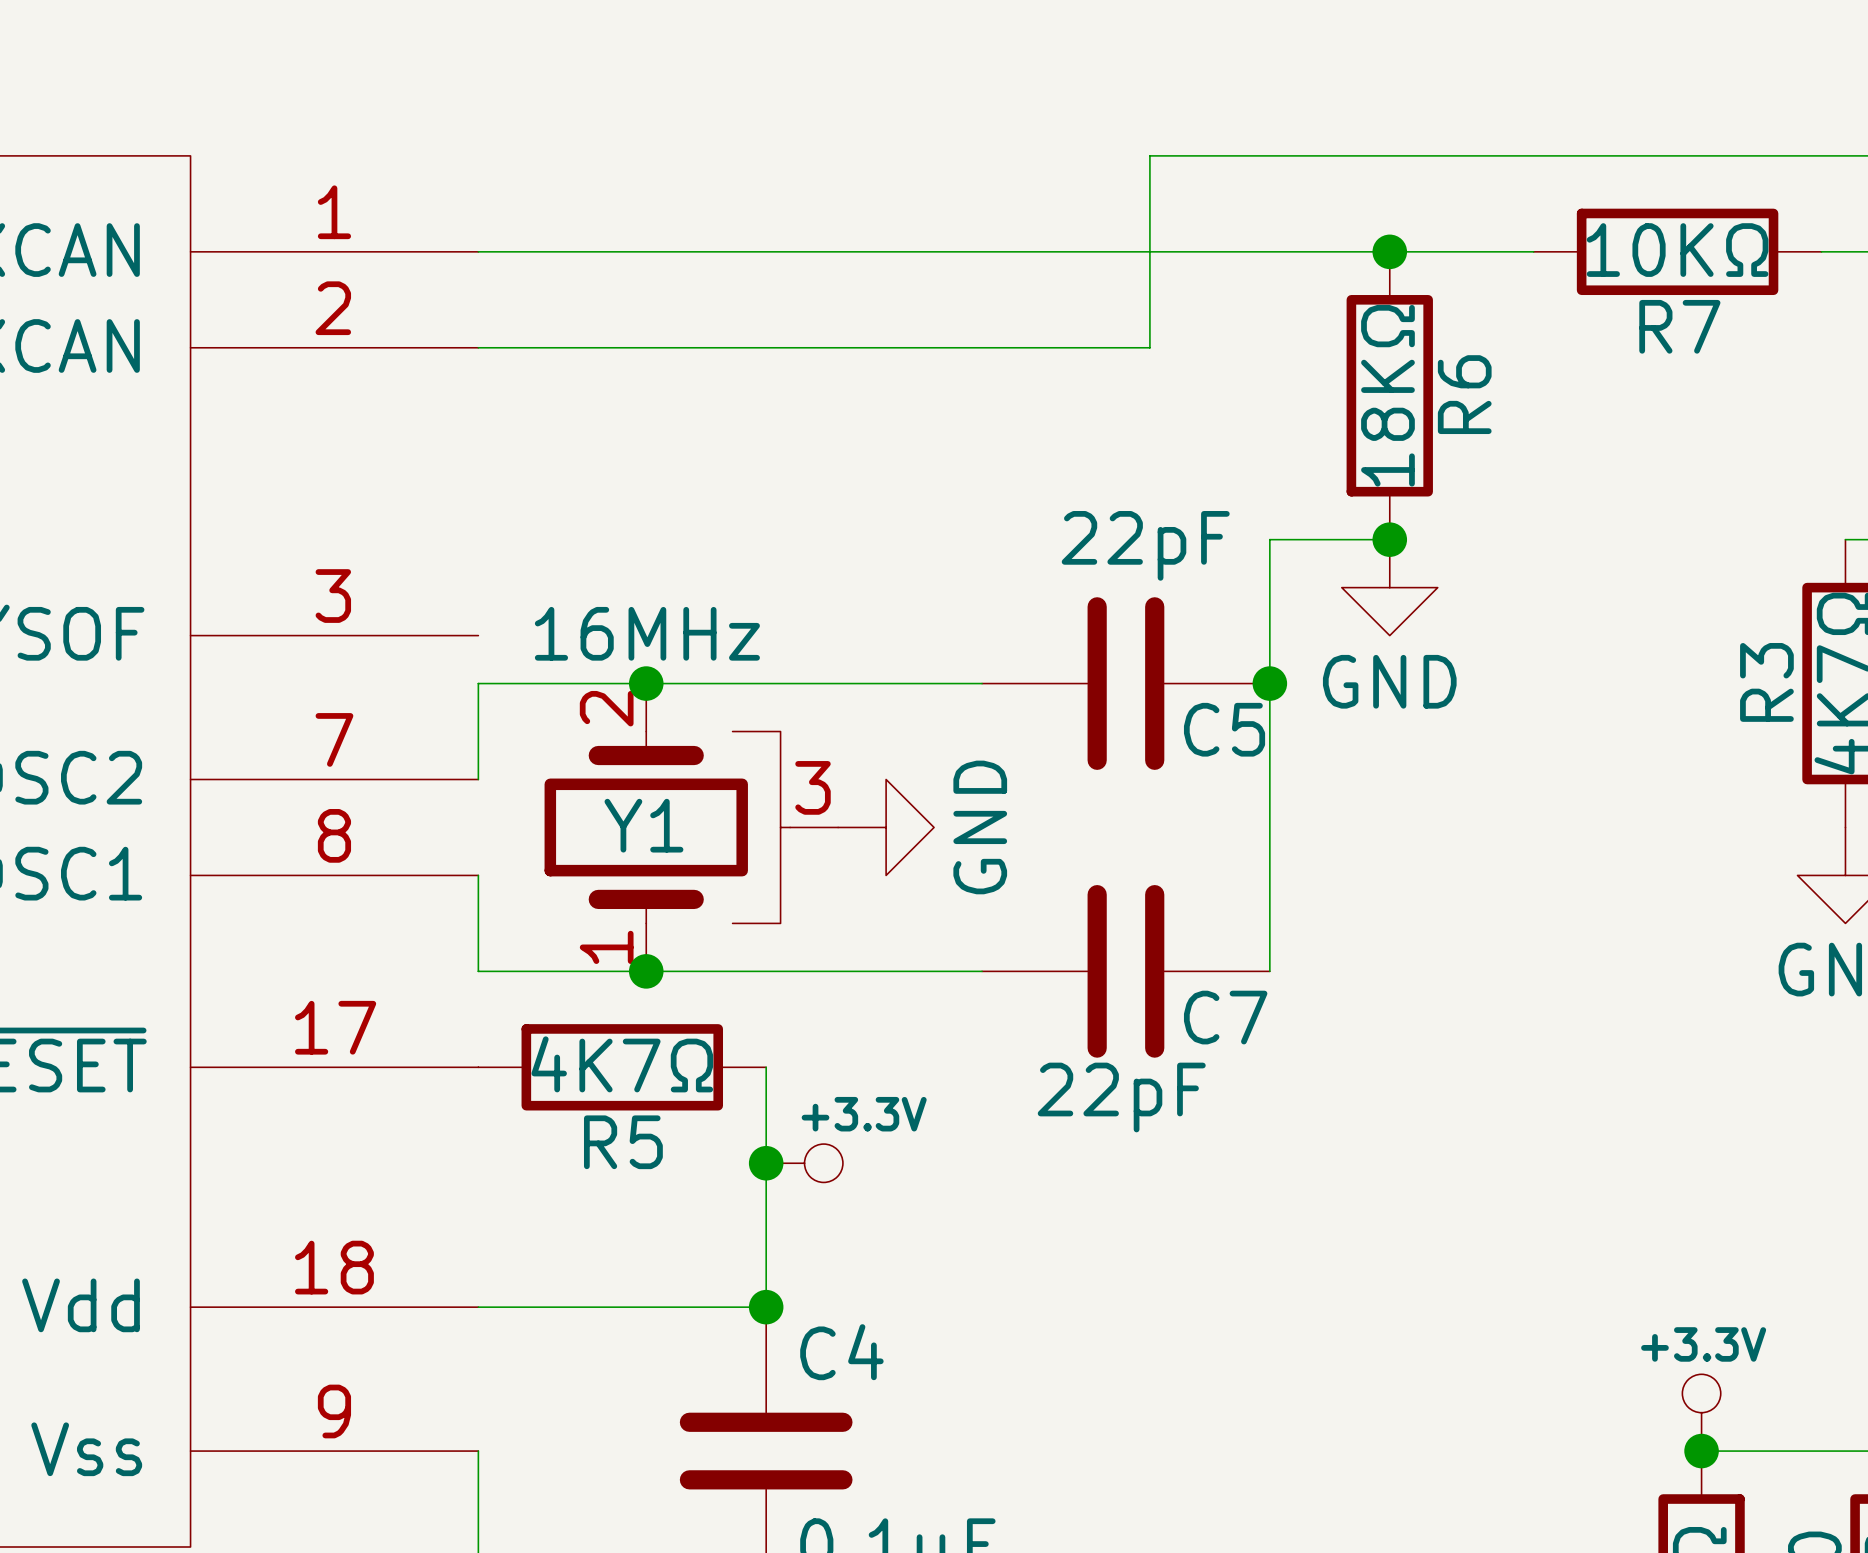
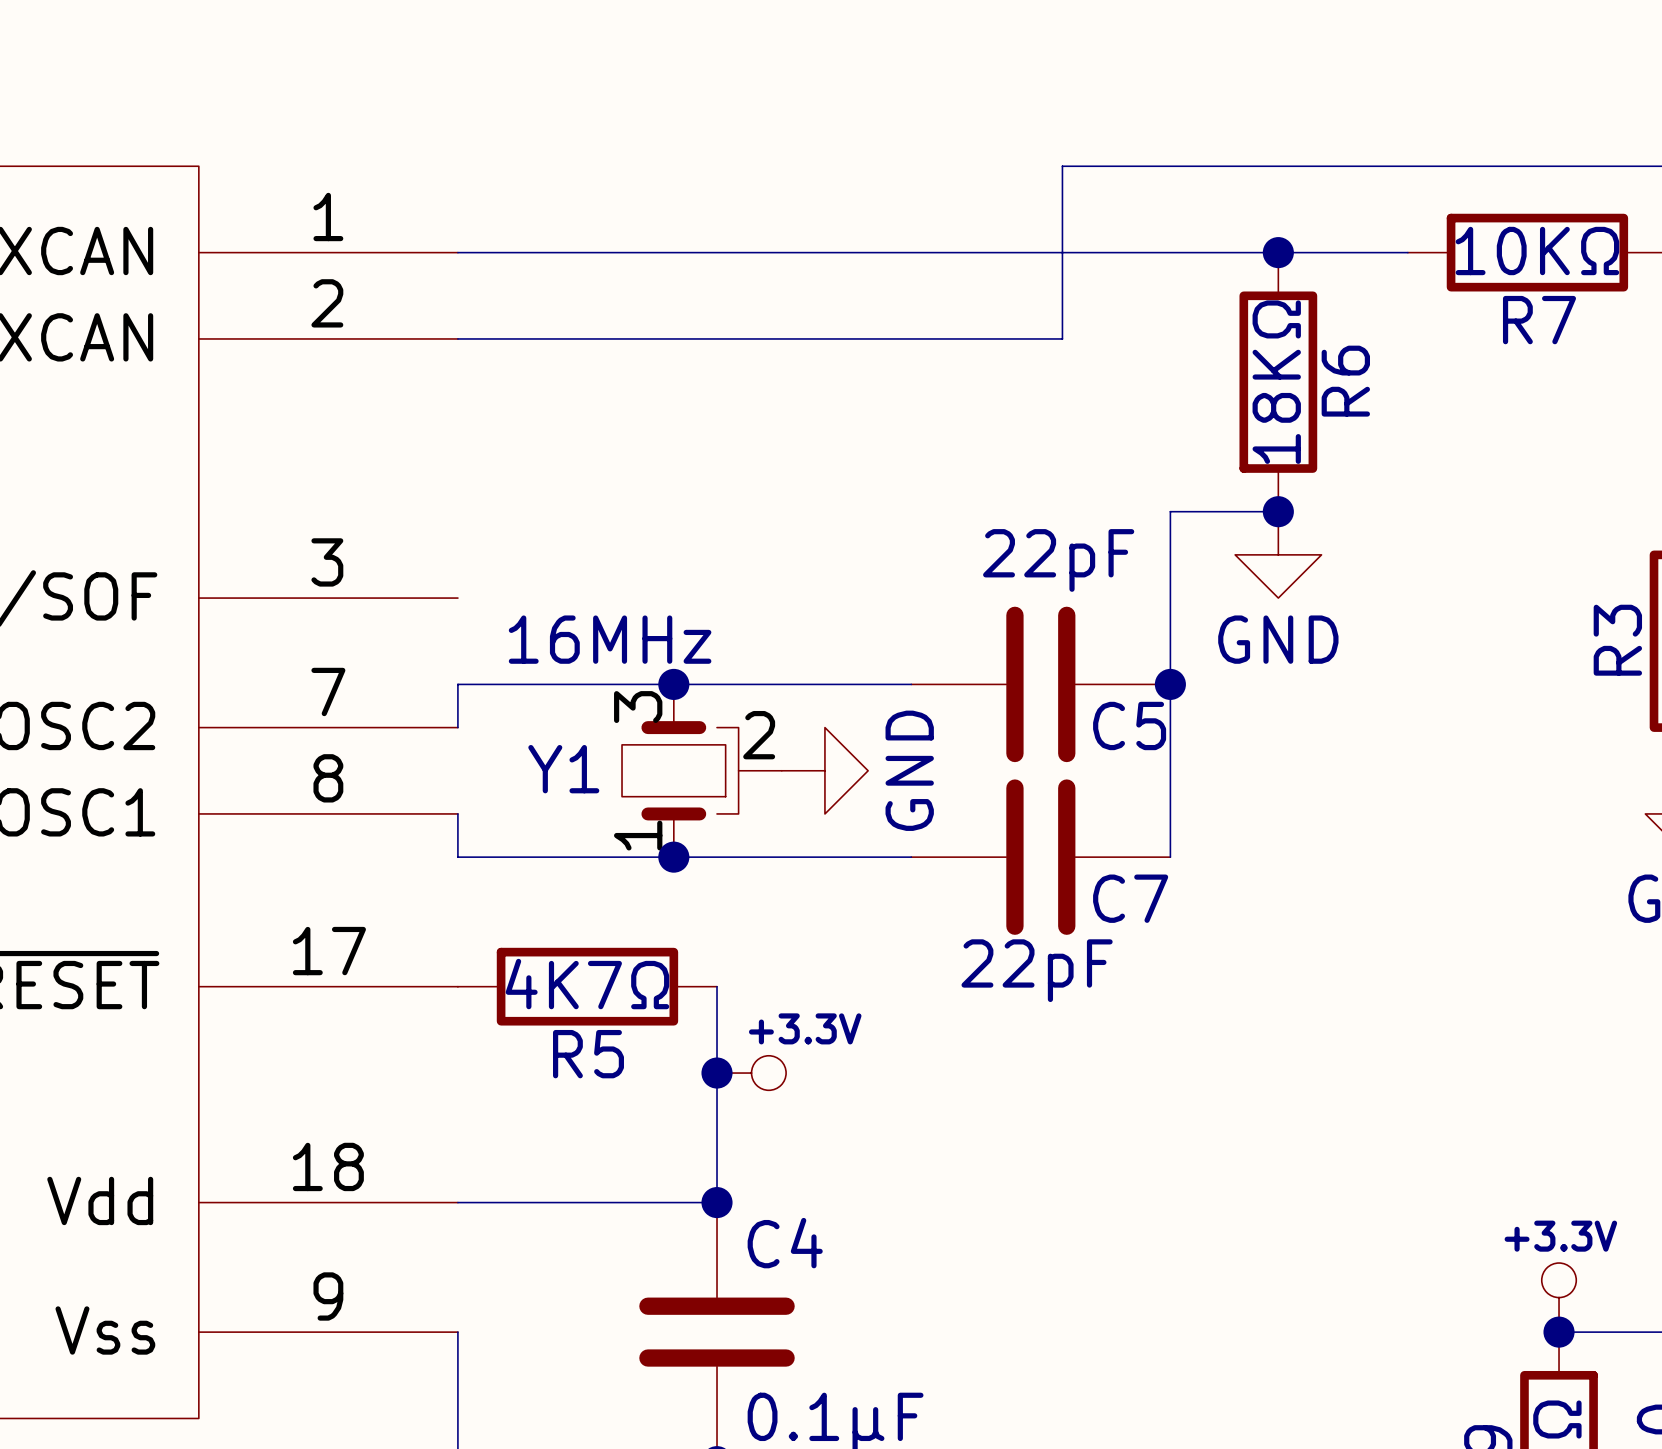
Y1 symbol: [544, 683, 839, 972] -> [622, 684, 782, 858]
junction position: (646, 683) -> (673, 684)
wire: (982, 683) (478, 683) (478, 731) -> (911, 684) (457, 684)
C5 position: (1125, 683) -> (1040, 684)
junction position: (1269, 683) -> (1170, 684)
Y1 name position: Y1 (643, 825) -> Y1 (563, 769)
wire: (478, 923) (478, 971) (982, 971) -> (457, 857) (911, 857)
wire: (1269, 923) (1269, 971) -> none
junction position: (646, 971) -> (673, 857)
C7 position: (1125, 971) -> (1040, 857)

